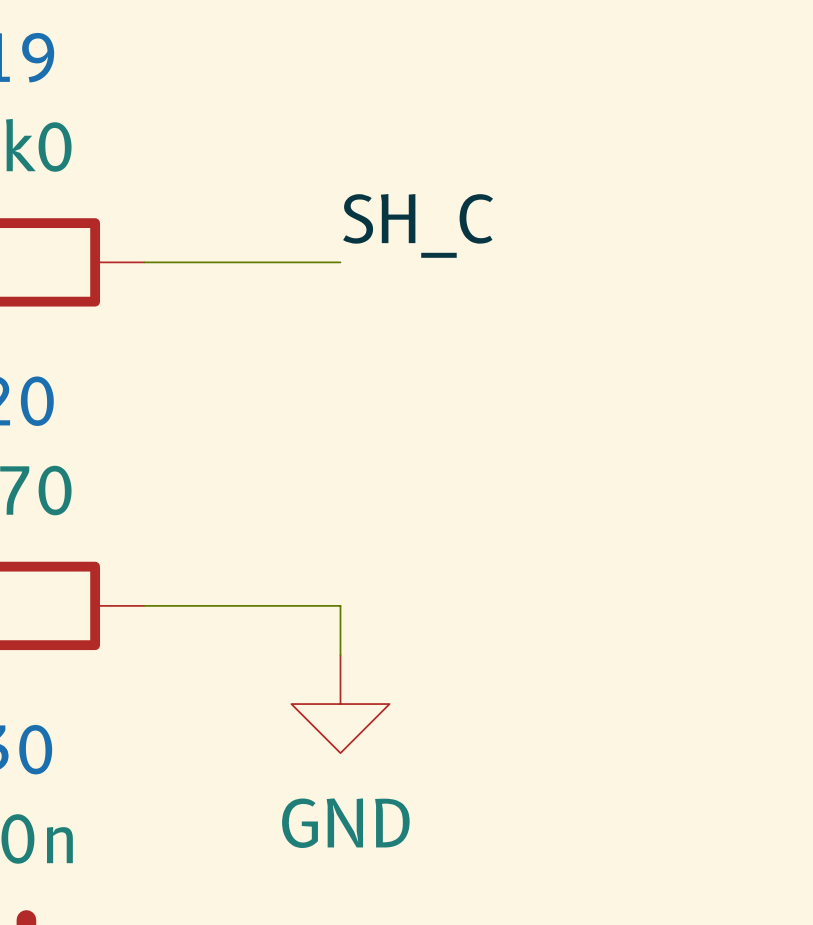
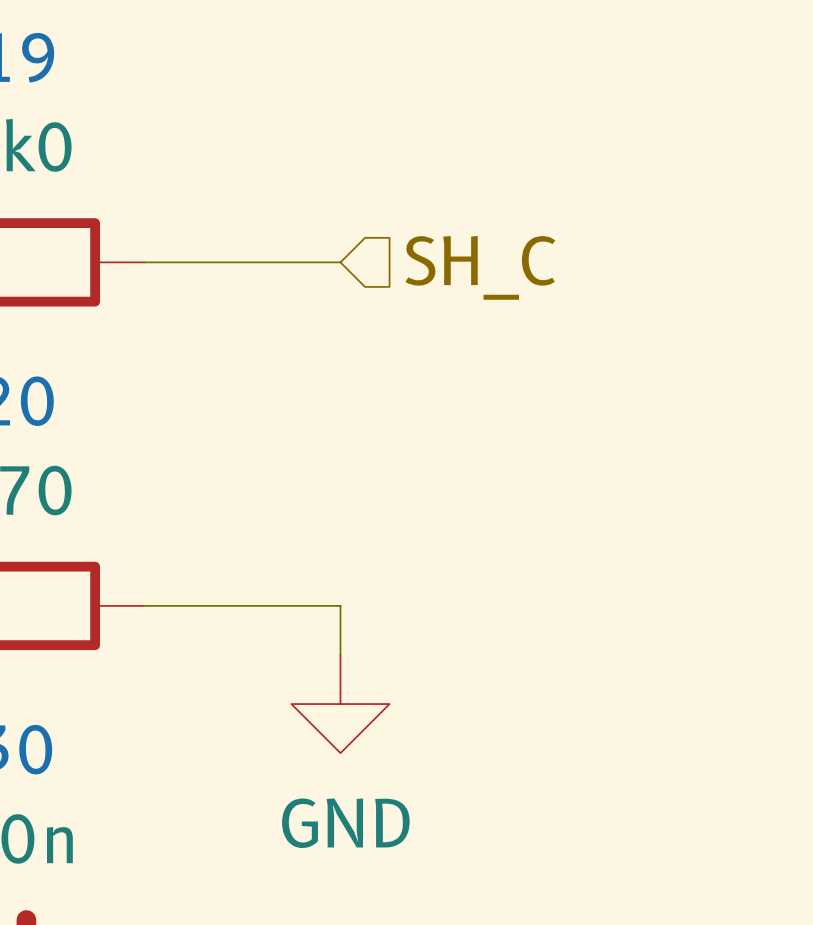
label: SH_C (418, 225) -> none
hierarchical label: none -> SH_C (480, 267)

